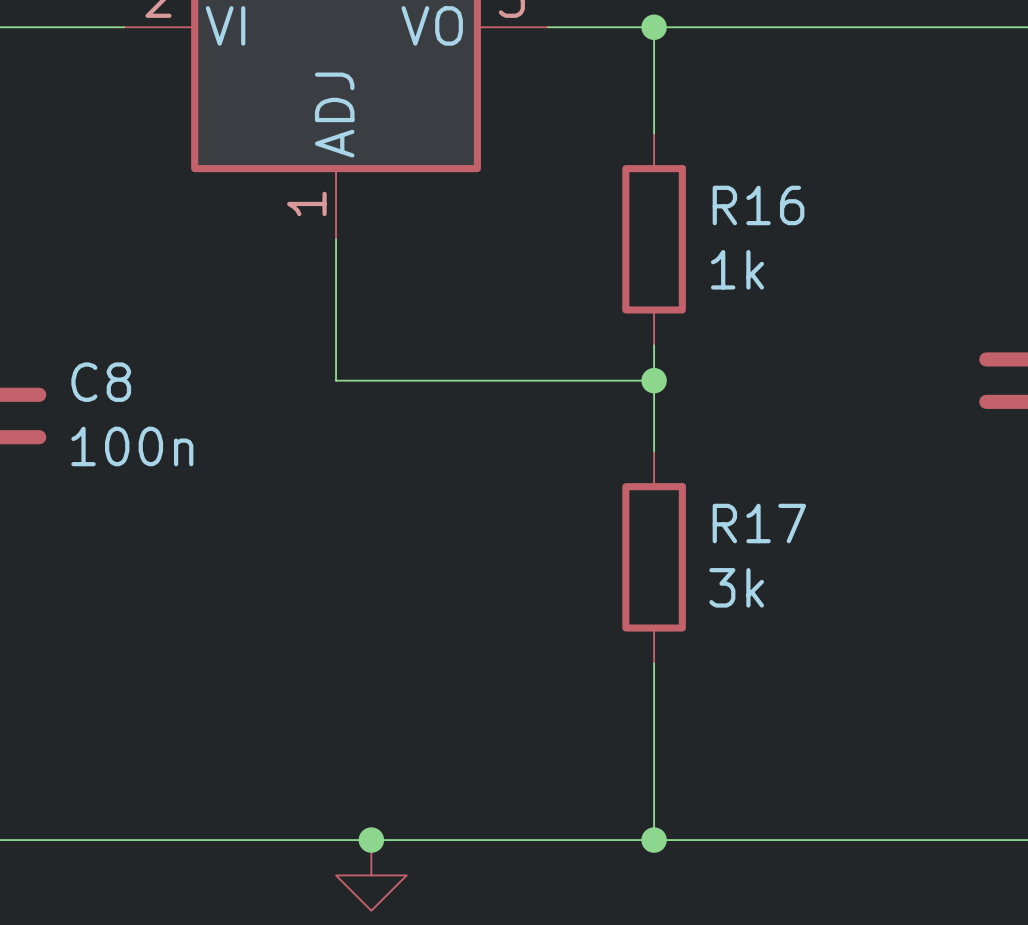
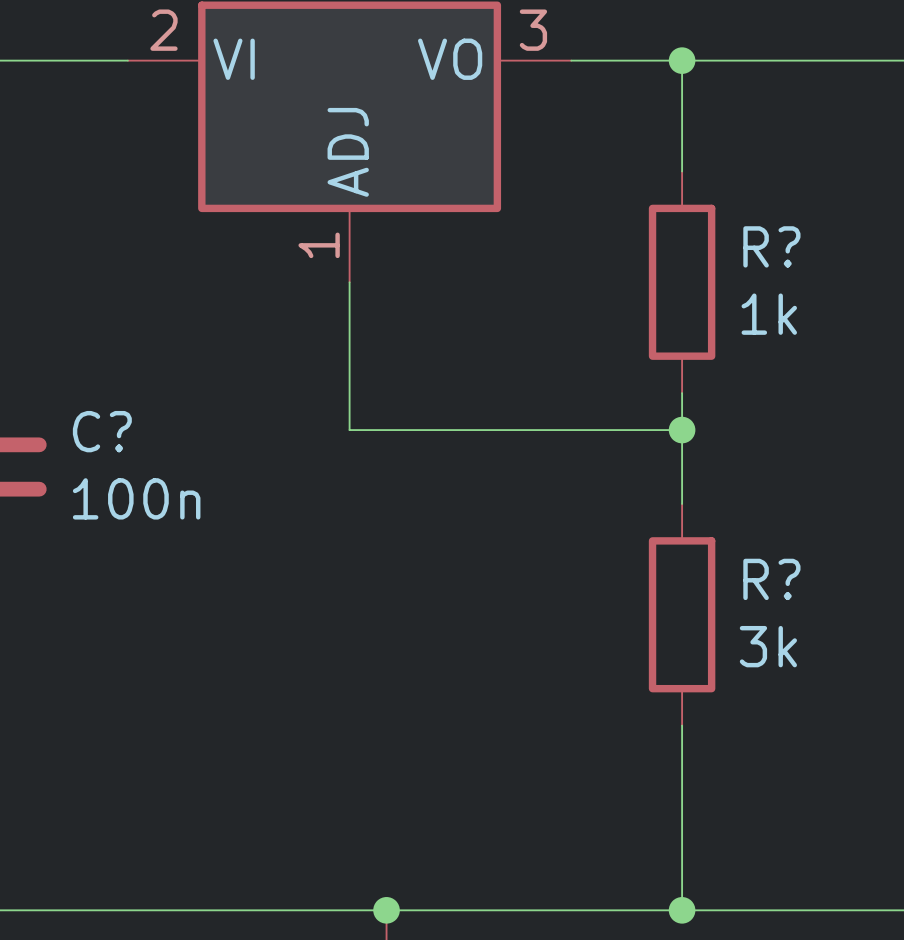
R16 name: R16 (758, 205) -> R? (771, 246)
C8 name: C8 (101, 382) -> C? (102, 431)
R17 name: R17 (759, 523) -> R? (771, 579)

